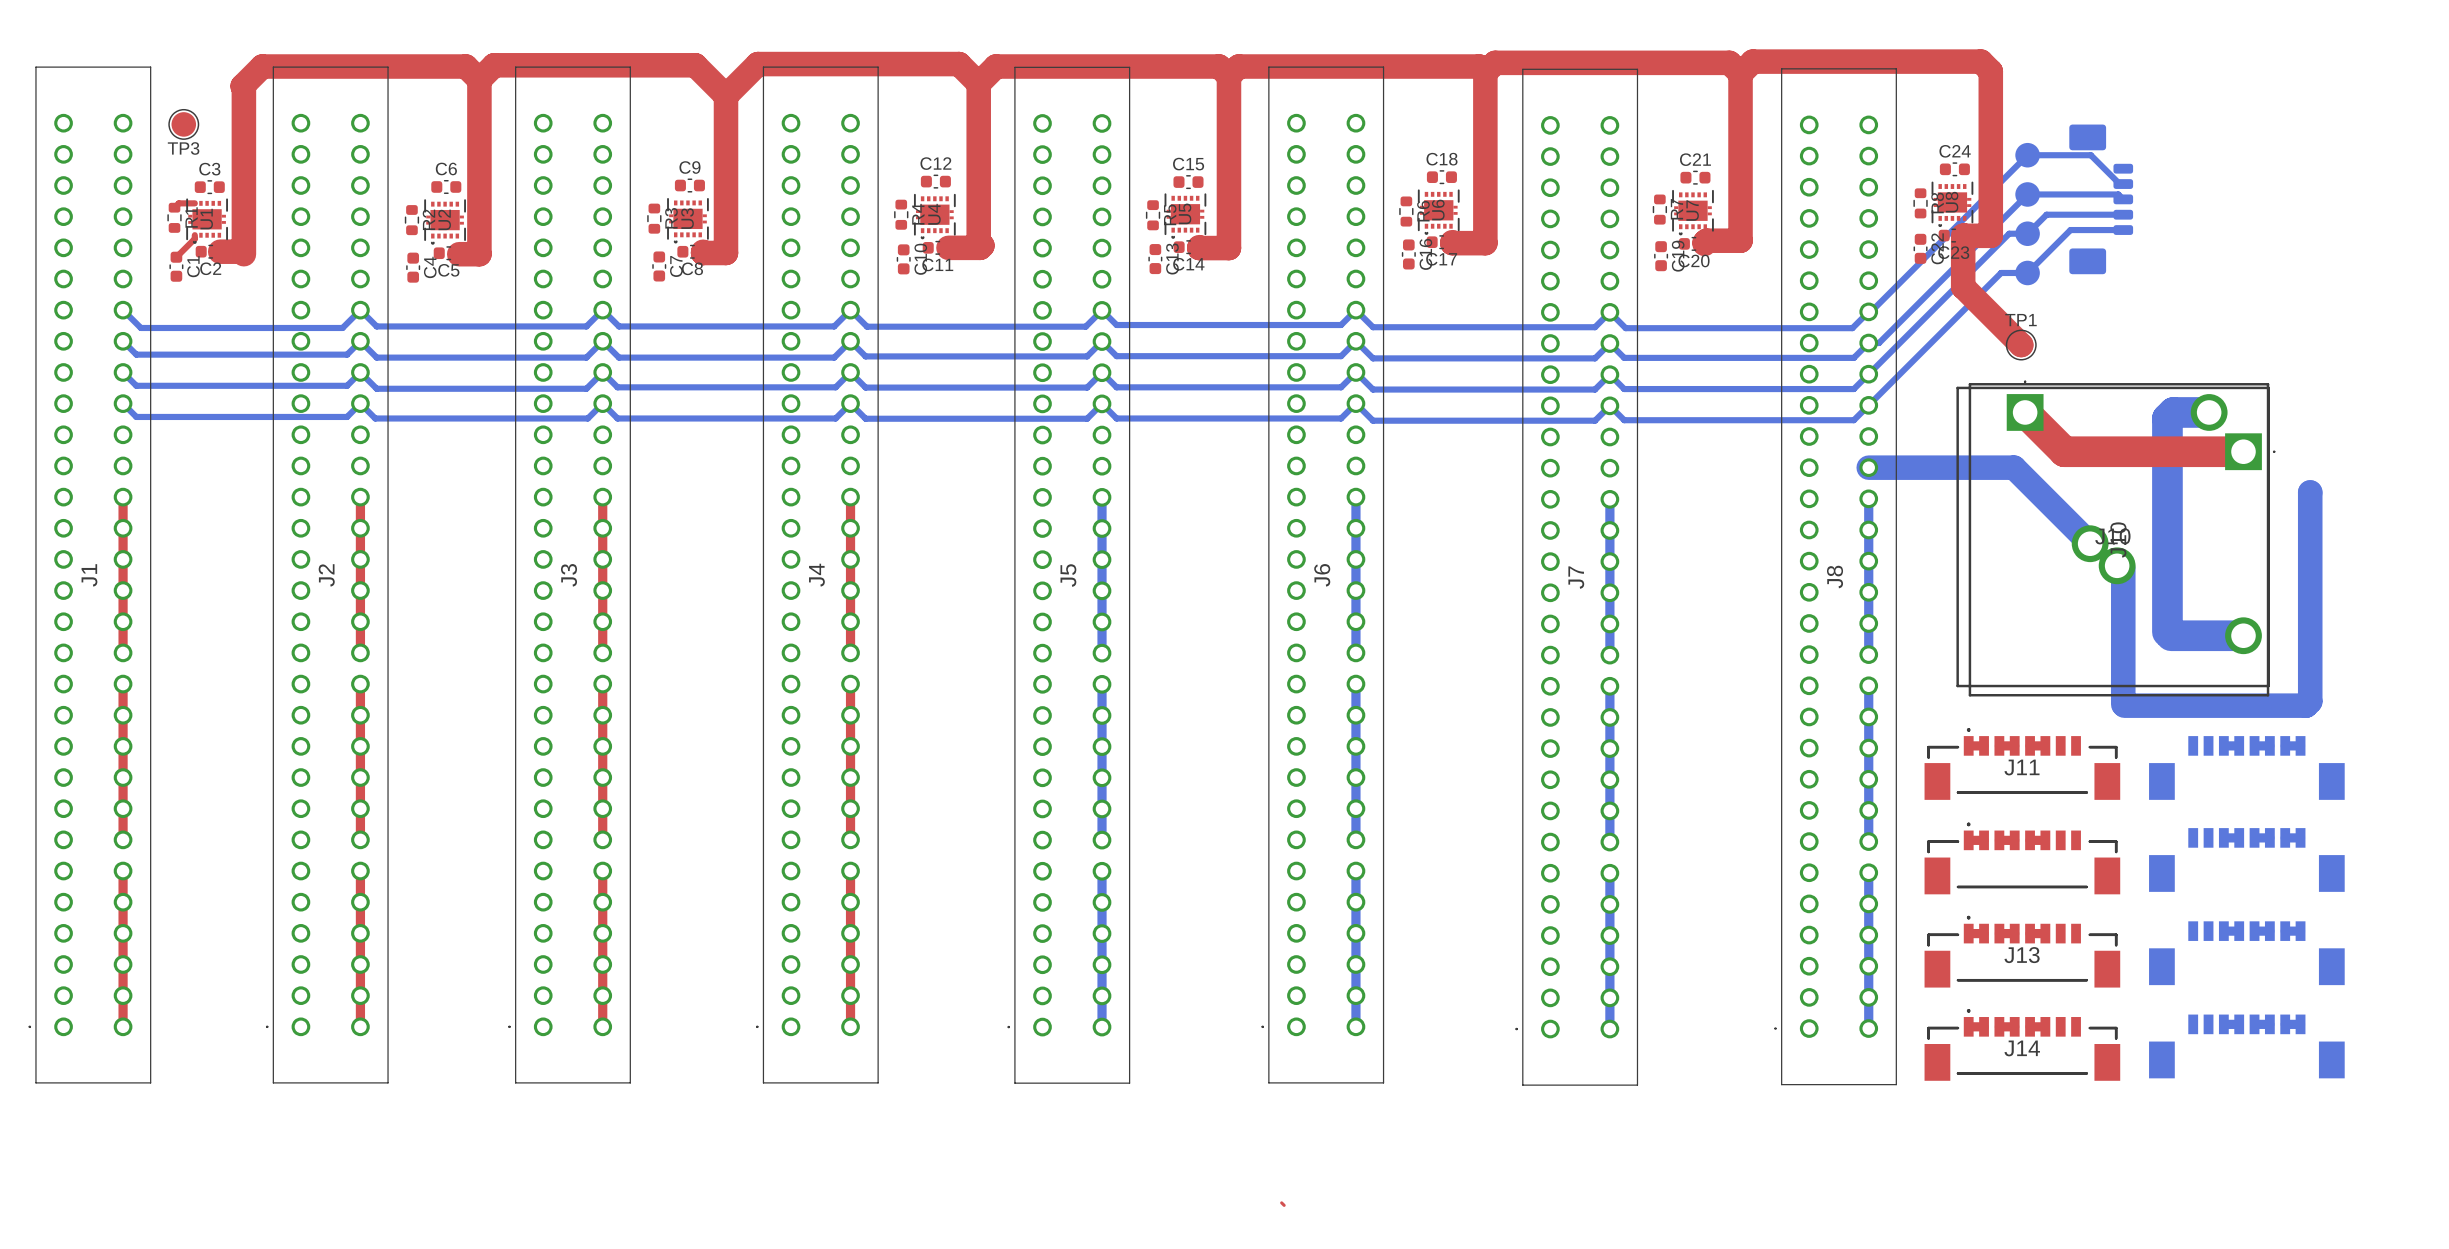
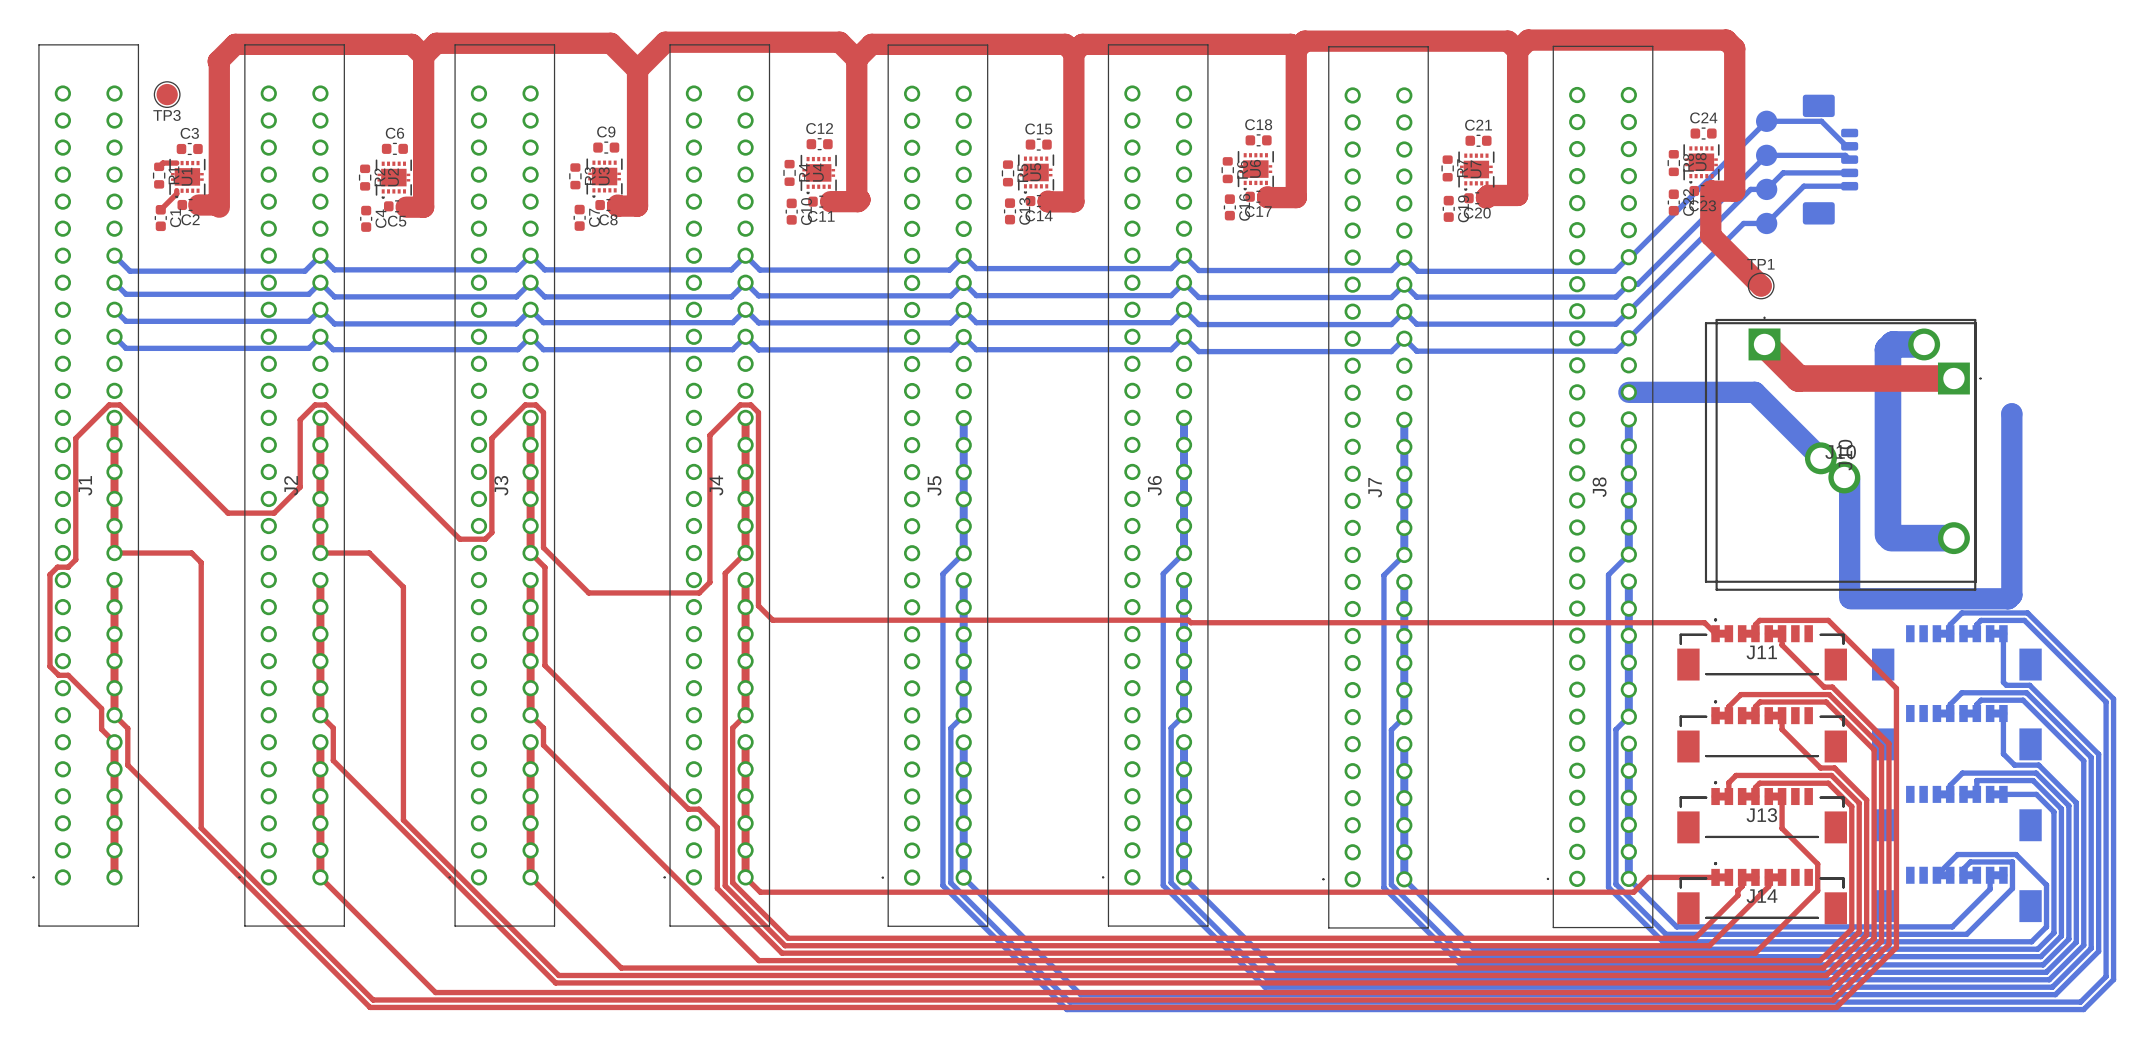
top track: none -> (114, 553) (191, 553) (201, 562) (201, 828) (373, 999) (1833, 999) (1888, 944) (1888, 743) (1832, 687) (1824, 687) (1782, 645) (1782, 633)
top track: none -> (320, 553) (369, 553) (403, 587) (403, 820) (558, 975) (1826, 975) (1866, 935) (1866, 800) (1834, 768) (1820, 768) (1782, 729) (1782, 715)
top track: none -> (530, 553) (544, 567) (544, 665) (688, 809) (698, 809) (717, 827) (717, 888) (782, 953) (1755, 953) (1817, 890) (1817, 864) (1782, 828) (1782, 796)
top track: none -> (745, 553) (725, 573) (725, 885) (785, 945) (1709, 945) (1768, 886) (1768, 877)
bottom track: none -> (1184, 553) (1163, 573) (1163, 885) (1265, 987) (2052, 987) (2091, 948) (2091, 757) (2026, 692) (1961, 692) (1950, 704) (1950, 713)
bottom track: none -> (963, 553) (942, 574) (942, 885) (1066, 1009) (2083, 1009) (2113, 979) (2113, 698) (2027, 612) (1961, 612) (1950, 624) (1950, 633)
bottom track: none -> (1628, 554) (1608, 574) (1608, 887) (1662, 941) (2031, 941) (2046, 926) (2046, 885) (2015, 854) (1957, 854) (1936, 875)
bottom track: none -> (1404, 554) (1383, 575) (1383, 887) (1461, 964) (2043, 964) (2068, 939) (2068, 805) (2036, 773) (1962, 773) (1950, 785) (1950, 794)
top track: none -> (1715, 633) (1704, 622) (772, 620) (758, 605) (758, 412) (750, 404) (740, 404) (709, 435) (709, 582) (699, 592) (588, 592) (543, 547) (543, 412) (535, 404) (525, 404) (491, 438) (491, 532) (485, 539) (459, 539) (325, 404) (315, 404) (300, 419) (300, 487) (274, 513) (227, 513) (119, 404) (109, 404) (75, 438) (75, 559) (68, 567) (57, 567) (49, 574) (49, 666) (58, 675) (68, 675) (101, 708) (101, 729) (114, 742)
top track: none -> (1755, 633) (1755, 624) (1759, 620) (1828, 620) (1896, 688) (1896, 947) (1836, 1007) (370, 1007) (127, 765) (127, 728) (114, 715)
bottom track: none -> (1976, 633) (1976, 624) (1981, 620) (2024, 620) (2106, 701) (2106, 976) (2080, 1002) (1069, 1002) (950, 882) (950, 728) (963, 715)
bottom track: none -> (2003, 633) (2003, 682) (2006, 685) (2029, 685) (2098, 754) (2098, 951) (2055, 994) (1080, 994) (963, 877)
bottom track: none -> (1976, 713) (1976, 704) (1981, 700) (2023, 700) (2083, 760) (2083, 945) (2049, 979) (1268, 979) (1171, 882) (1171, 728) (1184, 715)
bottom track: none -> (2003, 713) (2003, 753) (2014, 765) (2038, 765) (2076, 802) (2076, 942) (2046, 972) (1278, 972) (1184, 877)
top track: none -> (320, 715) (333, 728) (333, 760) (555, 982) (1829, 982) (1874, 938) (1874, 749) (1826, 702) (1760, 702) (1755, 706) (1755, 715)
top track: none -> (530, 715) (543, 728) (543, 745) (758, 960) (1820, 960) (1851, 929) (1851, 806) (1828, 783) (1759, 783) (1755, 787) (1755, 796)
top track: none -> (745, 715) (732, 728) (732, 882) (788, 938) (1695, 938) (1737, 895) (1737, 890) (1742, 886) (1742, 877)
top track: none -> (1728, 715) (1728, 706) (1740, 694) (1829, 694) (1881, 746) (1881, 941) (1830, 992) (435, 992) (320, 877)
bottom track: none -> (1628, 716) (1615, 729) (1615, 884) (1666, 934) (1966, 934) (2012, 888) (2012, 861) (1970, 861) (1963, 868) (1963, 875)
bottom track: none -> (1404, 717) (1391, 730) (1391, 884) (1463, 956) (2040, 956) (2061, 936) (2061, 808) (2033, 780) (1976, 780) (1976, 794)
bottom track: none -> (2003, 794) (2036, 794) (2053, 811) (2053, 932) (2037, 949) (1474, 949) (1404, 879)
top track: none -> (1728, 796) (1728, 782) (1736, 775) (1831, 775) (1859, 803) (1859, 932) (1823, 968) (621, 968) (530, 877)
bottom track: none -> (1990, 875) (1990, 889) (1952, 926) (1676, 926) (1628, 878)
top track: none -> (745, 877) (760, 892) (1633, 892) (1648, 877) (1715, 877)
top track: (1281, 1202) (1284, 1205) -> none

